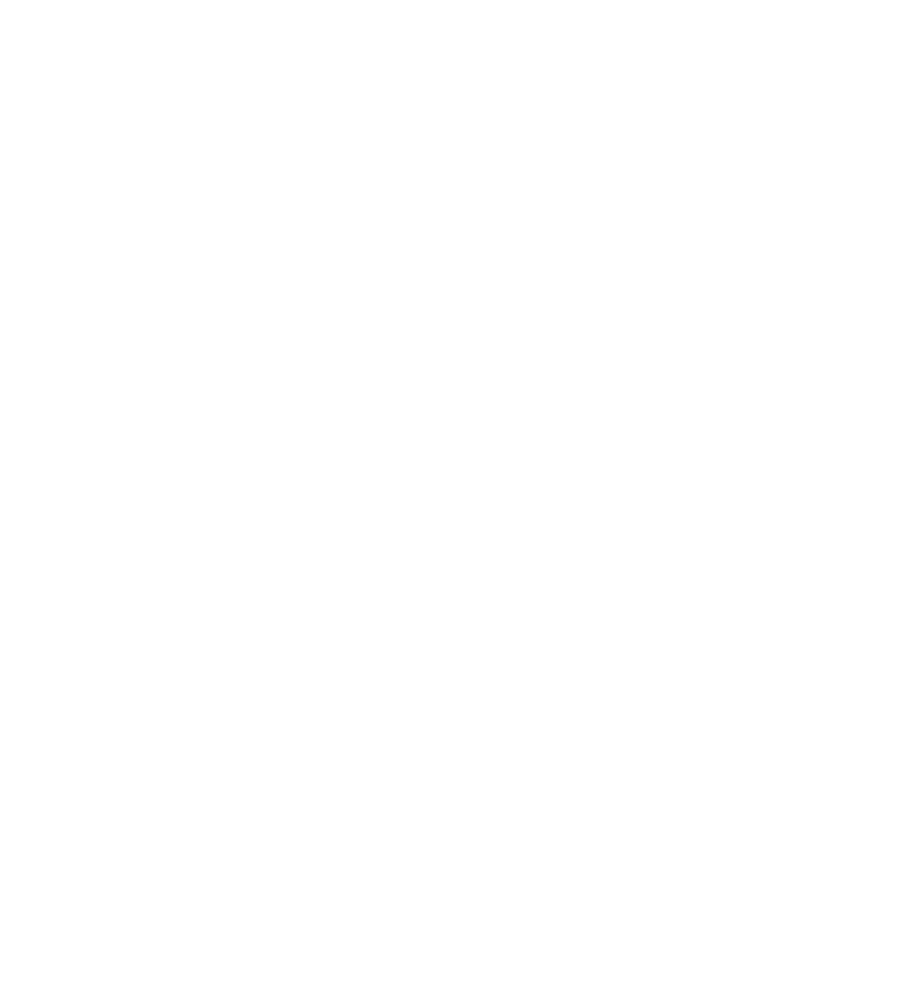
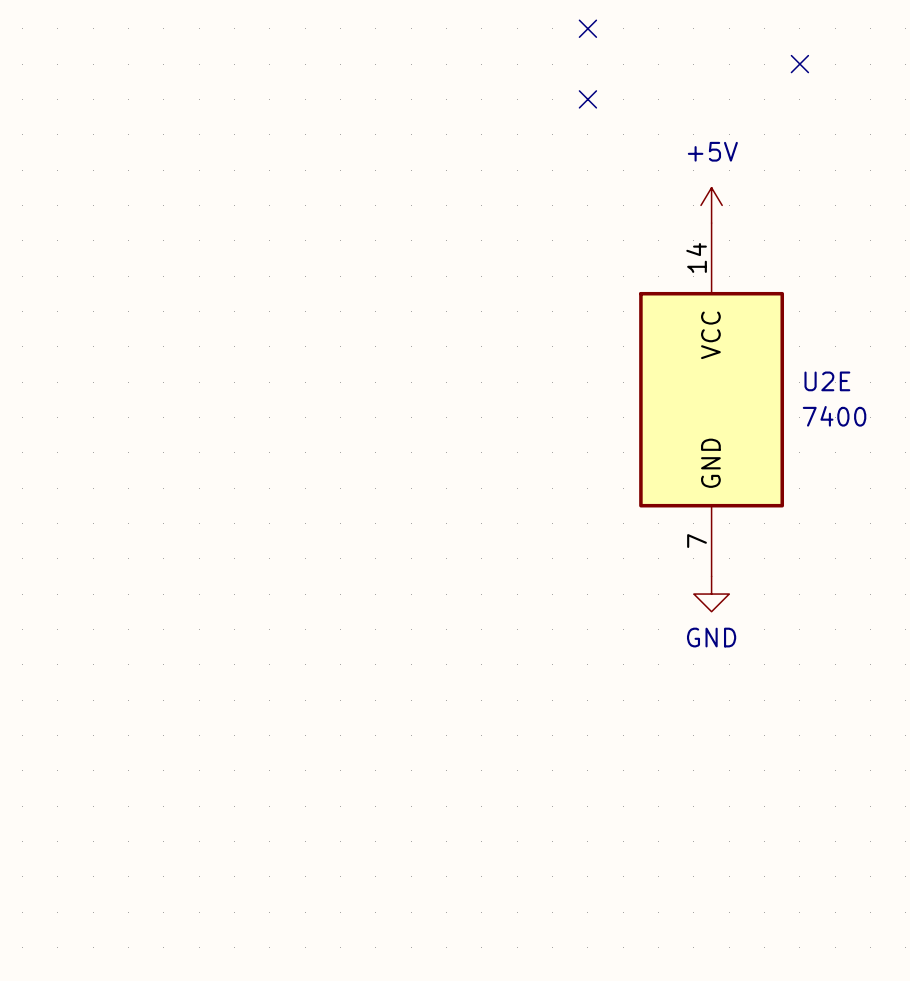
no-connect mark: none -> (587, 28)
no-connect mark: none -> (799, 64)
no-connect mark: none -> (587, 99)
power symbol: none -> +5V (711, 205)
U2E: none -> 7400 (711, 399)
power symbol: none -> GND (711, 594)

